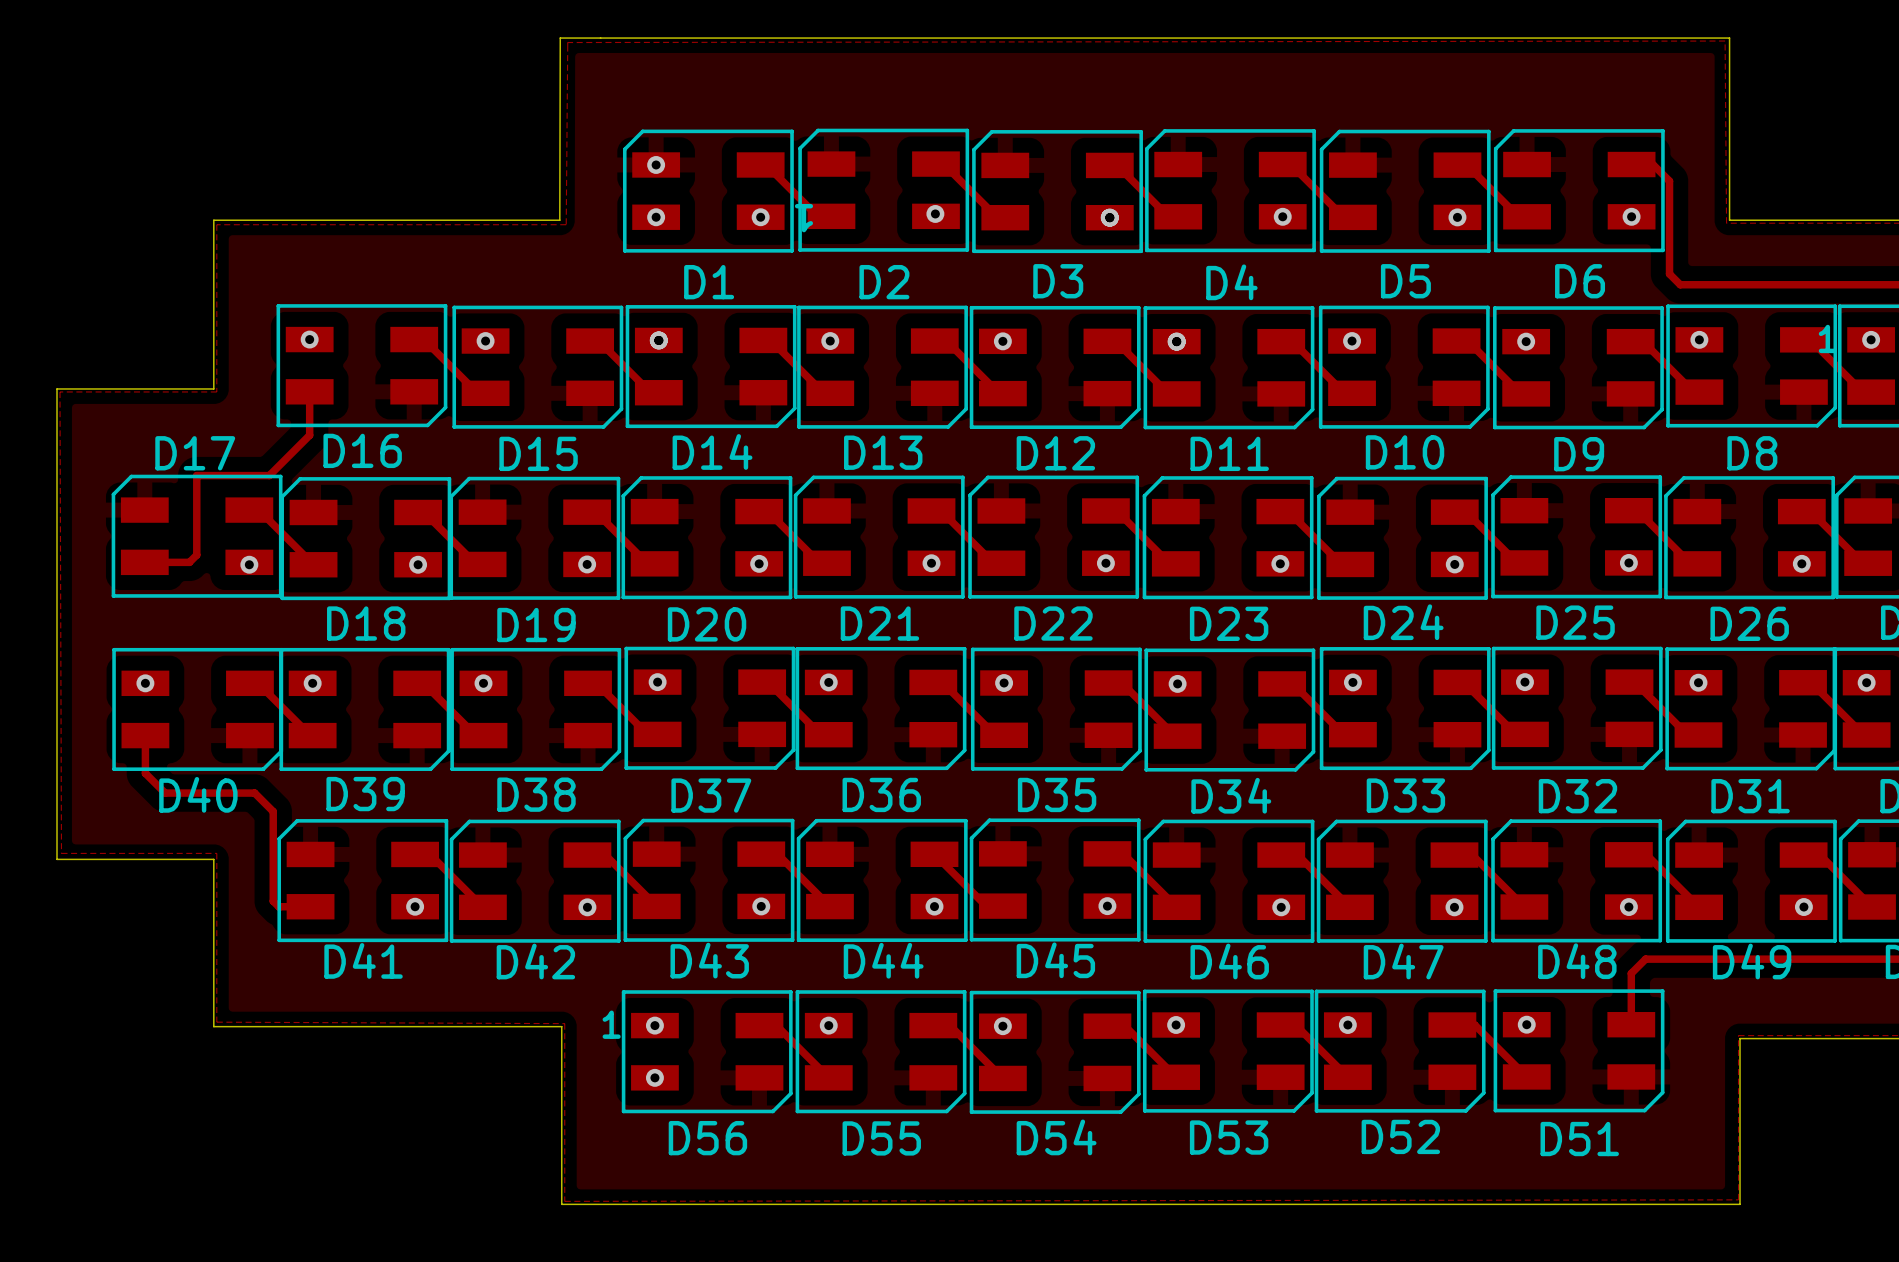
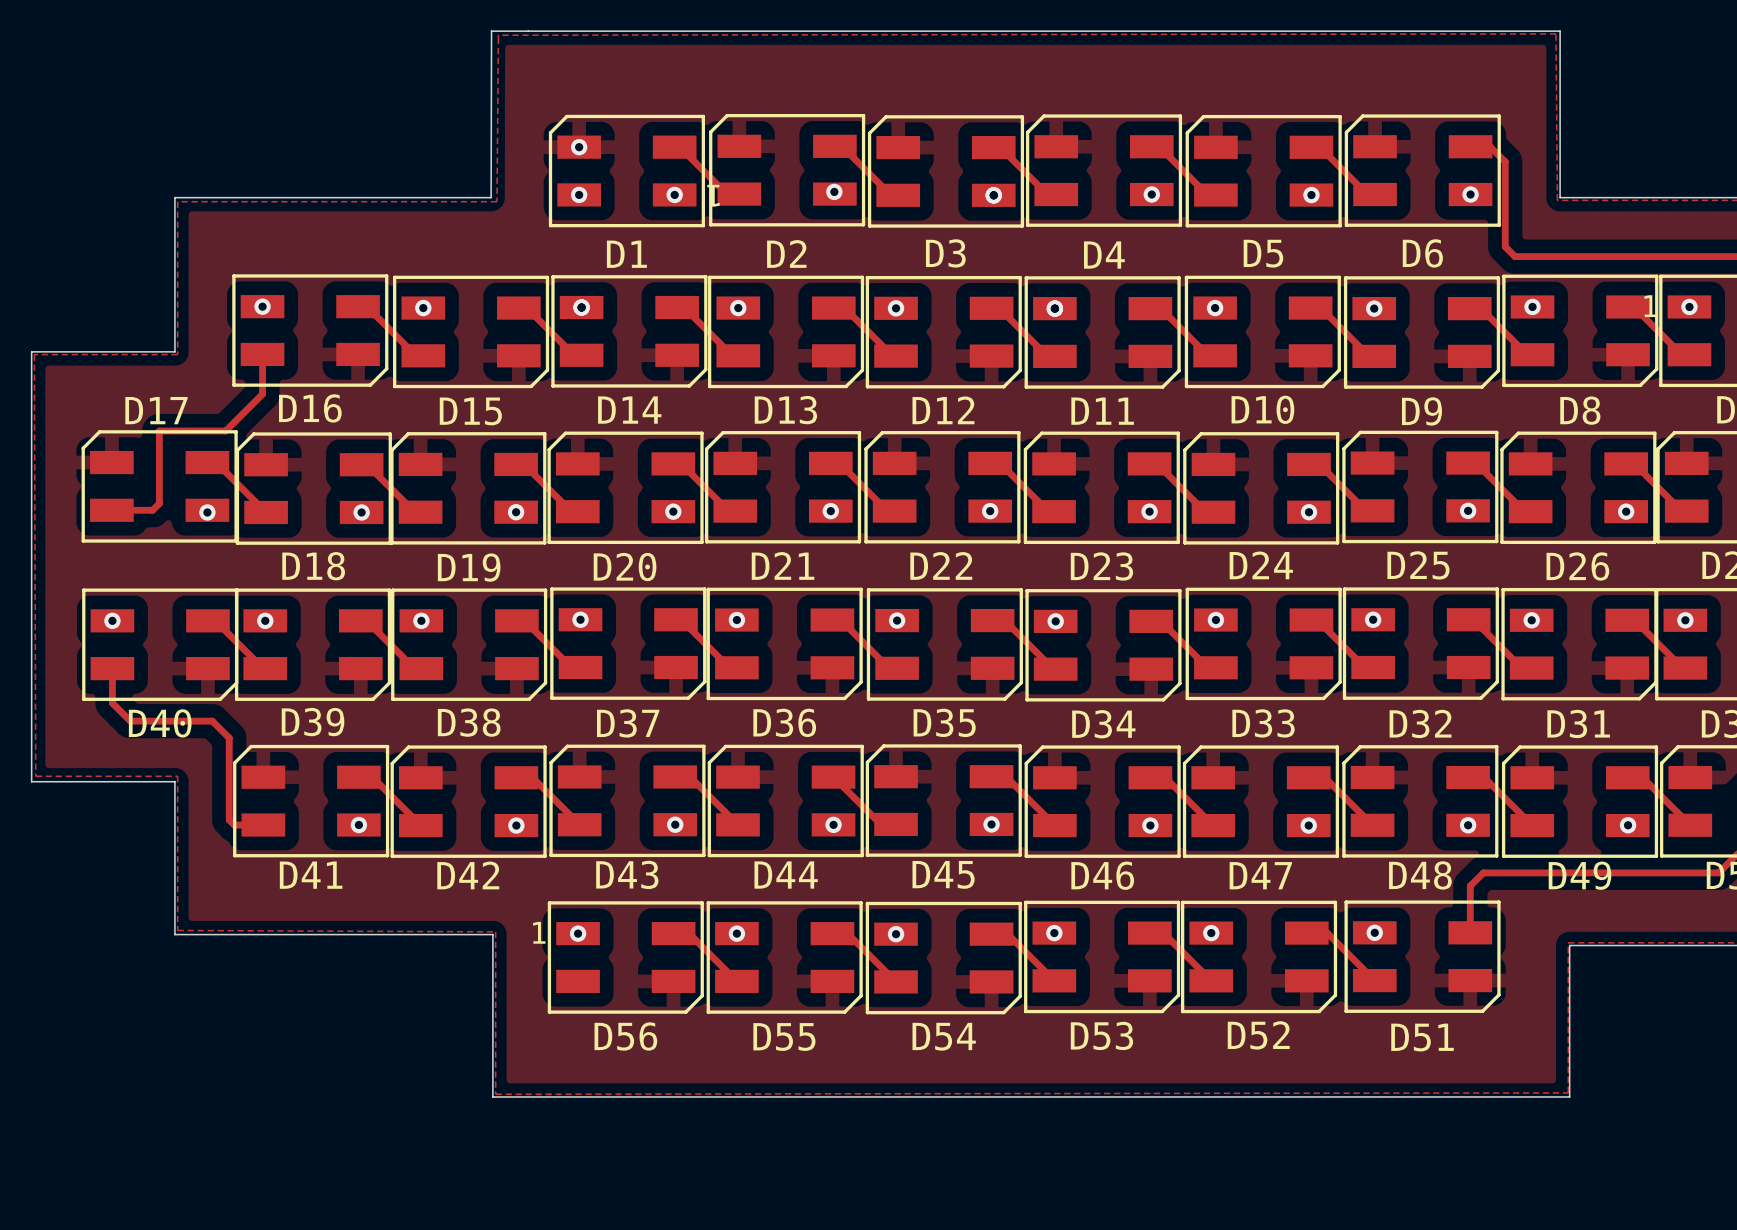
via: (654, 1077) -> none

